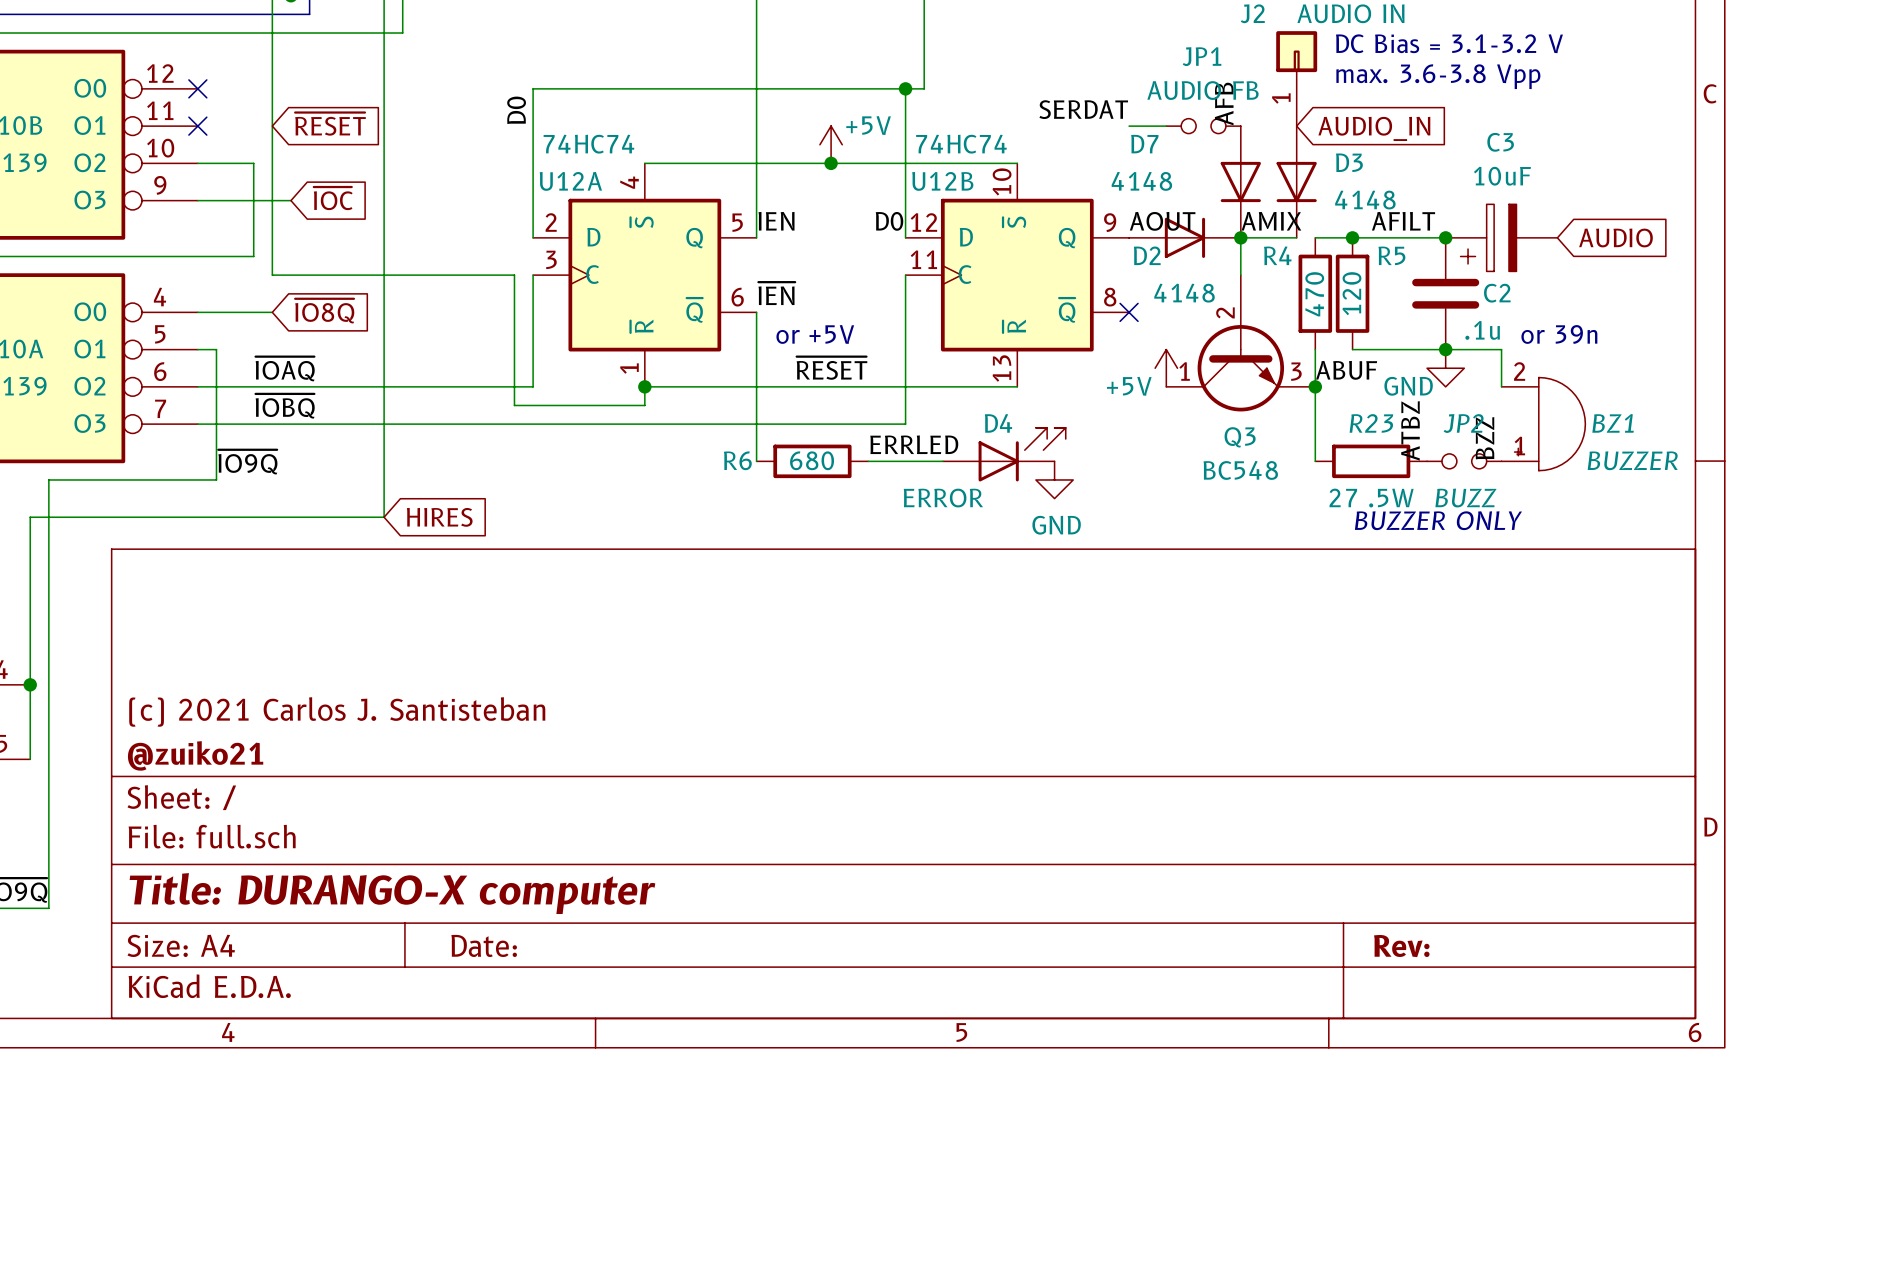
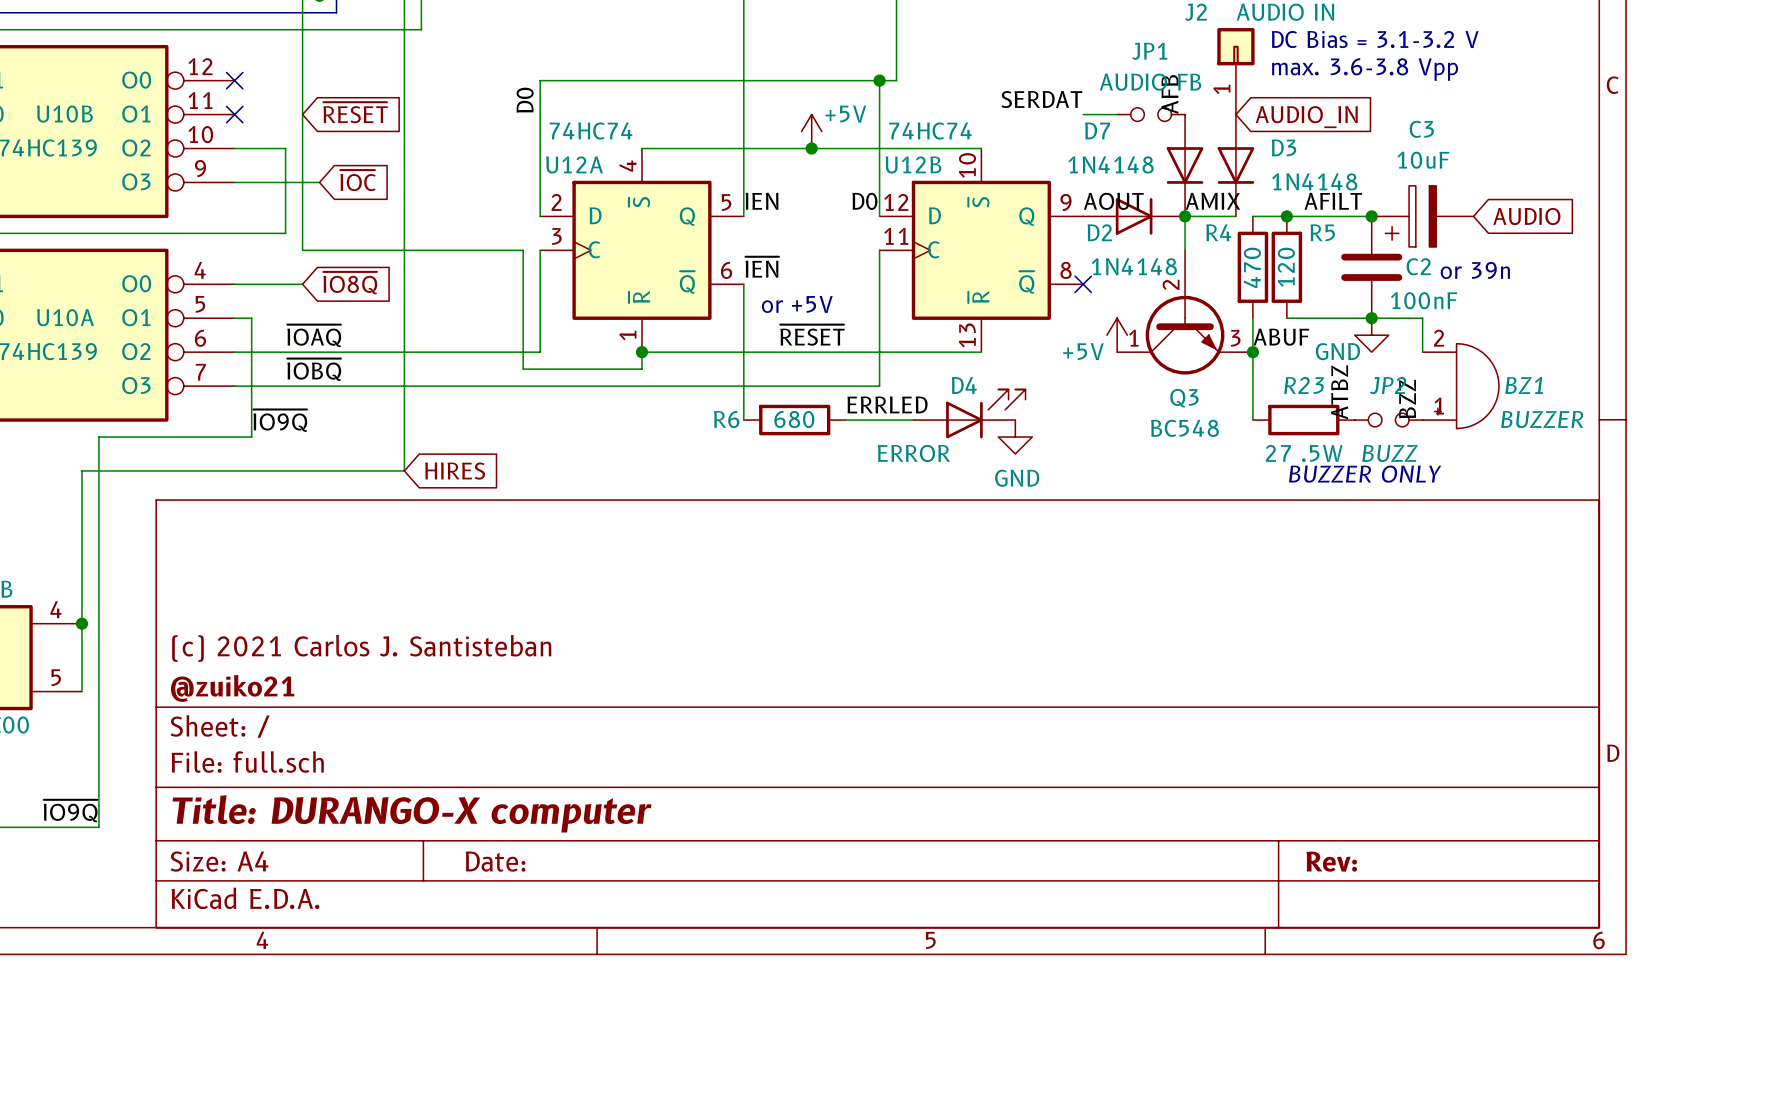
D7 value: 4148 (1141, 181) -> 1N4148 (1111, 164)
D3 value: 4148 (1365, 200) -> 1N4148 (1314, 181)
D2 value: 4148 (1184, 293) -> 1N4148 (1134, 266)
C2 value: .1u (1482, 330) -> 100nF (1424, 300)
text position: or 39n (1559, 334) -> or 39n (1475, 270)

